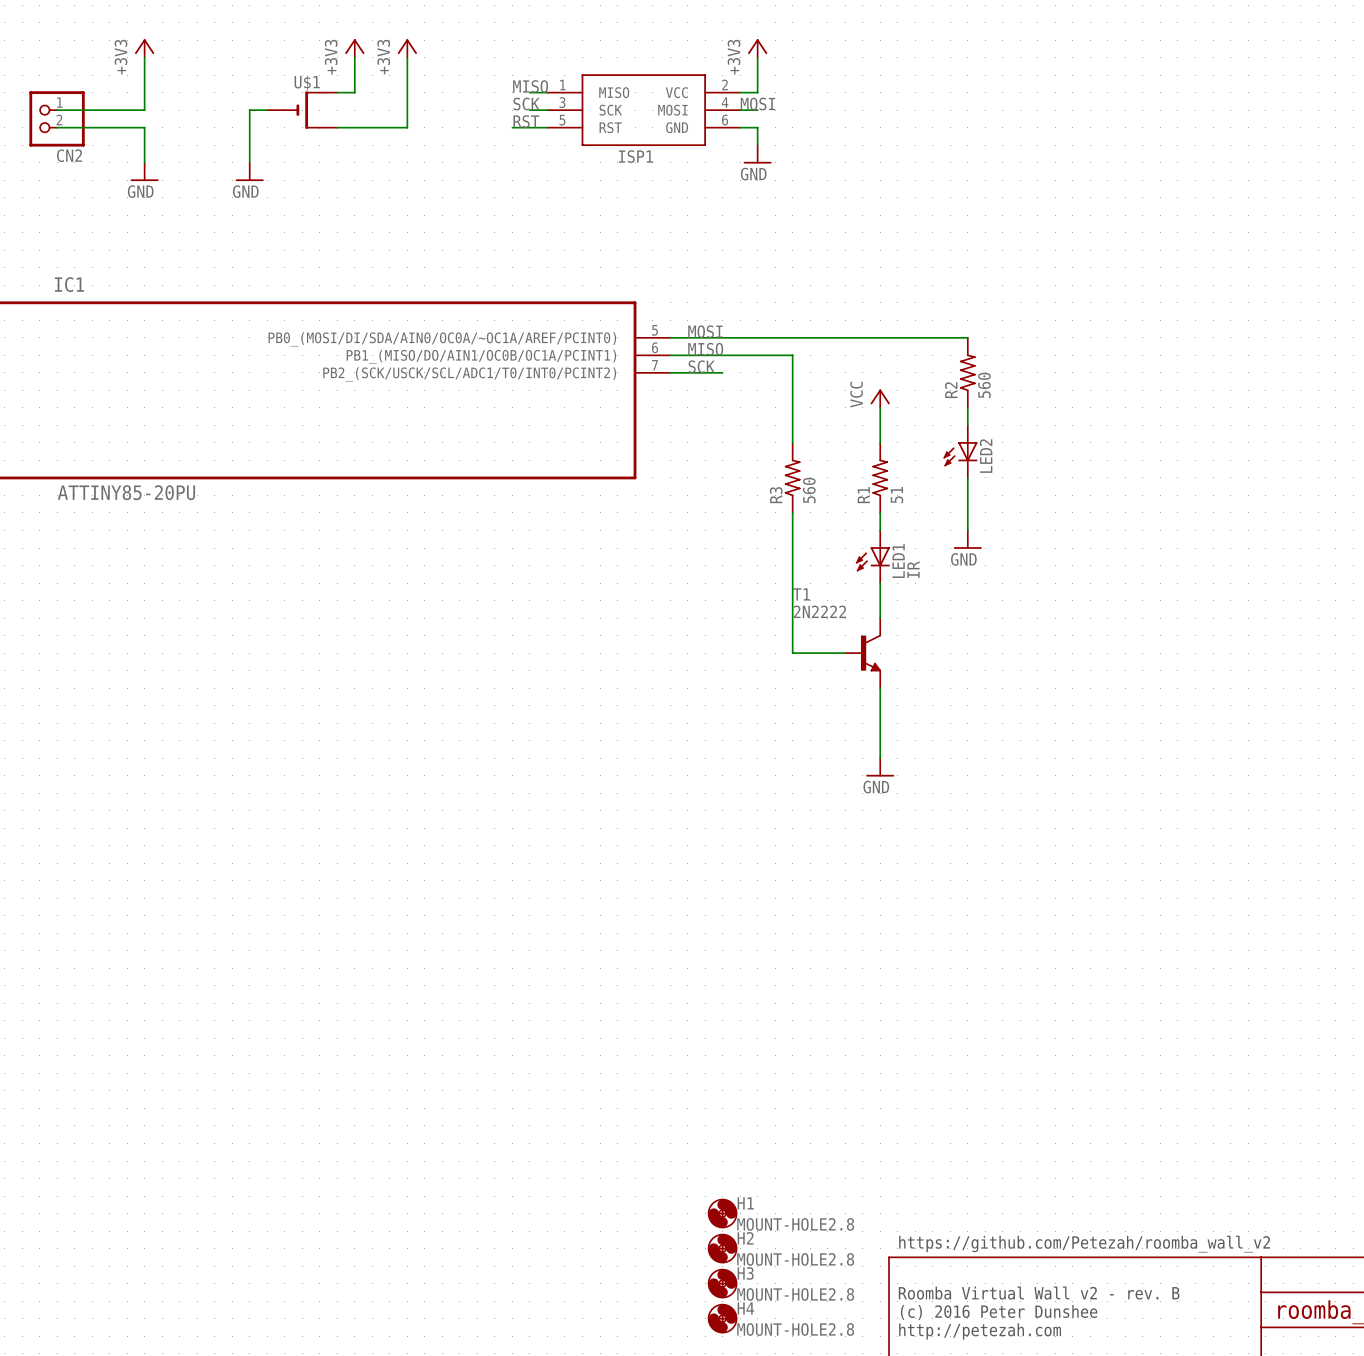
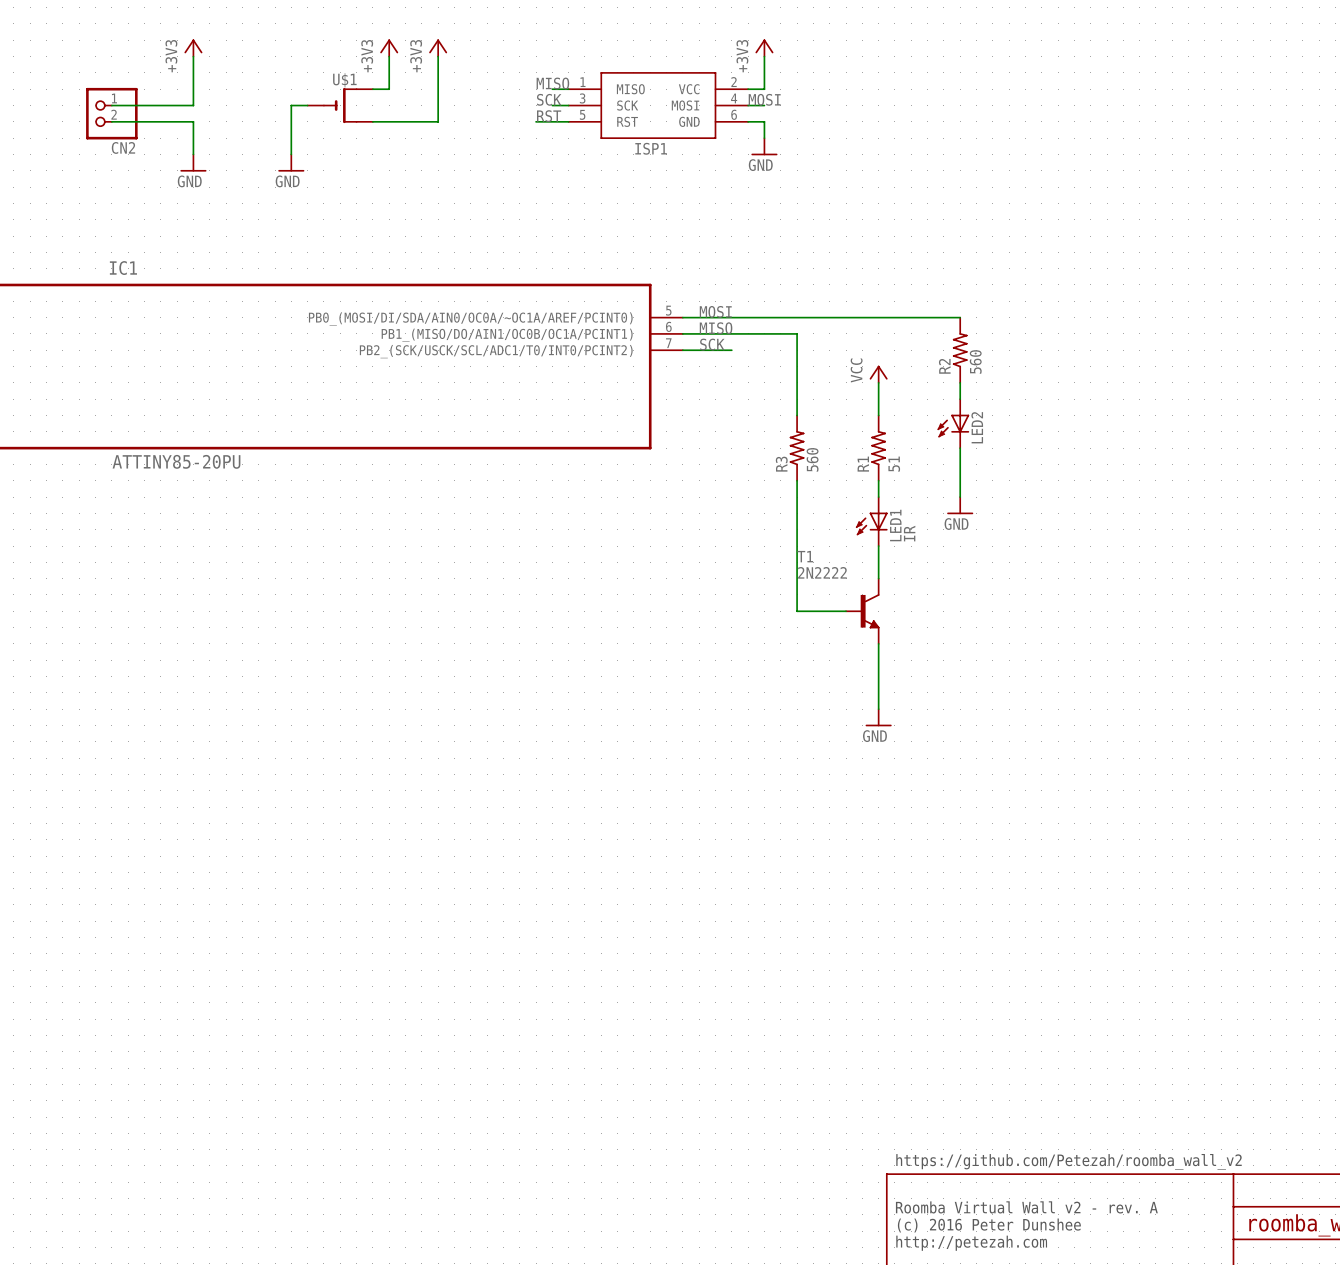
H1: MOUNT-HOLE2.8 (722, 1213) -> none
H2: MOUNT-HOLE2.8 (722, 1248) -> none
H3: MOUNT-HOLE2.8 (722, 1283) -> none
text: Roomba Virtual Wall v2 - rev. B (1039, 1293) -> Roomba Virtual Wall v2 - rev. A (1026, 1207)
H4: MOUNT-HOLE2.8 (722, 1318) -> none

